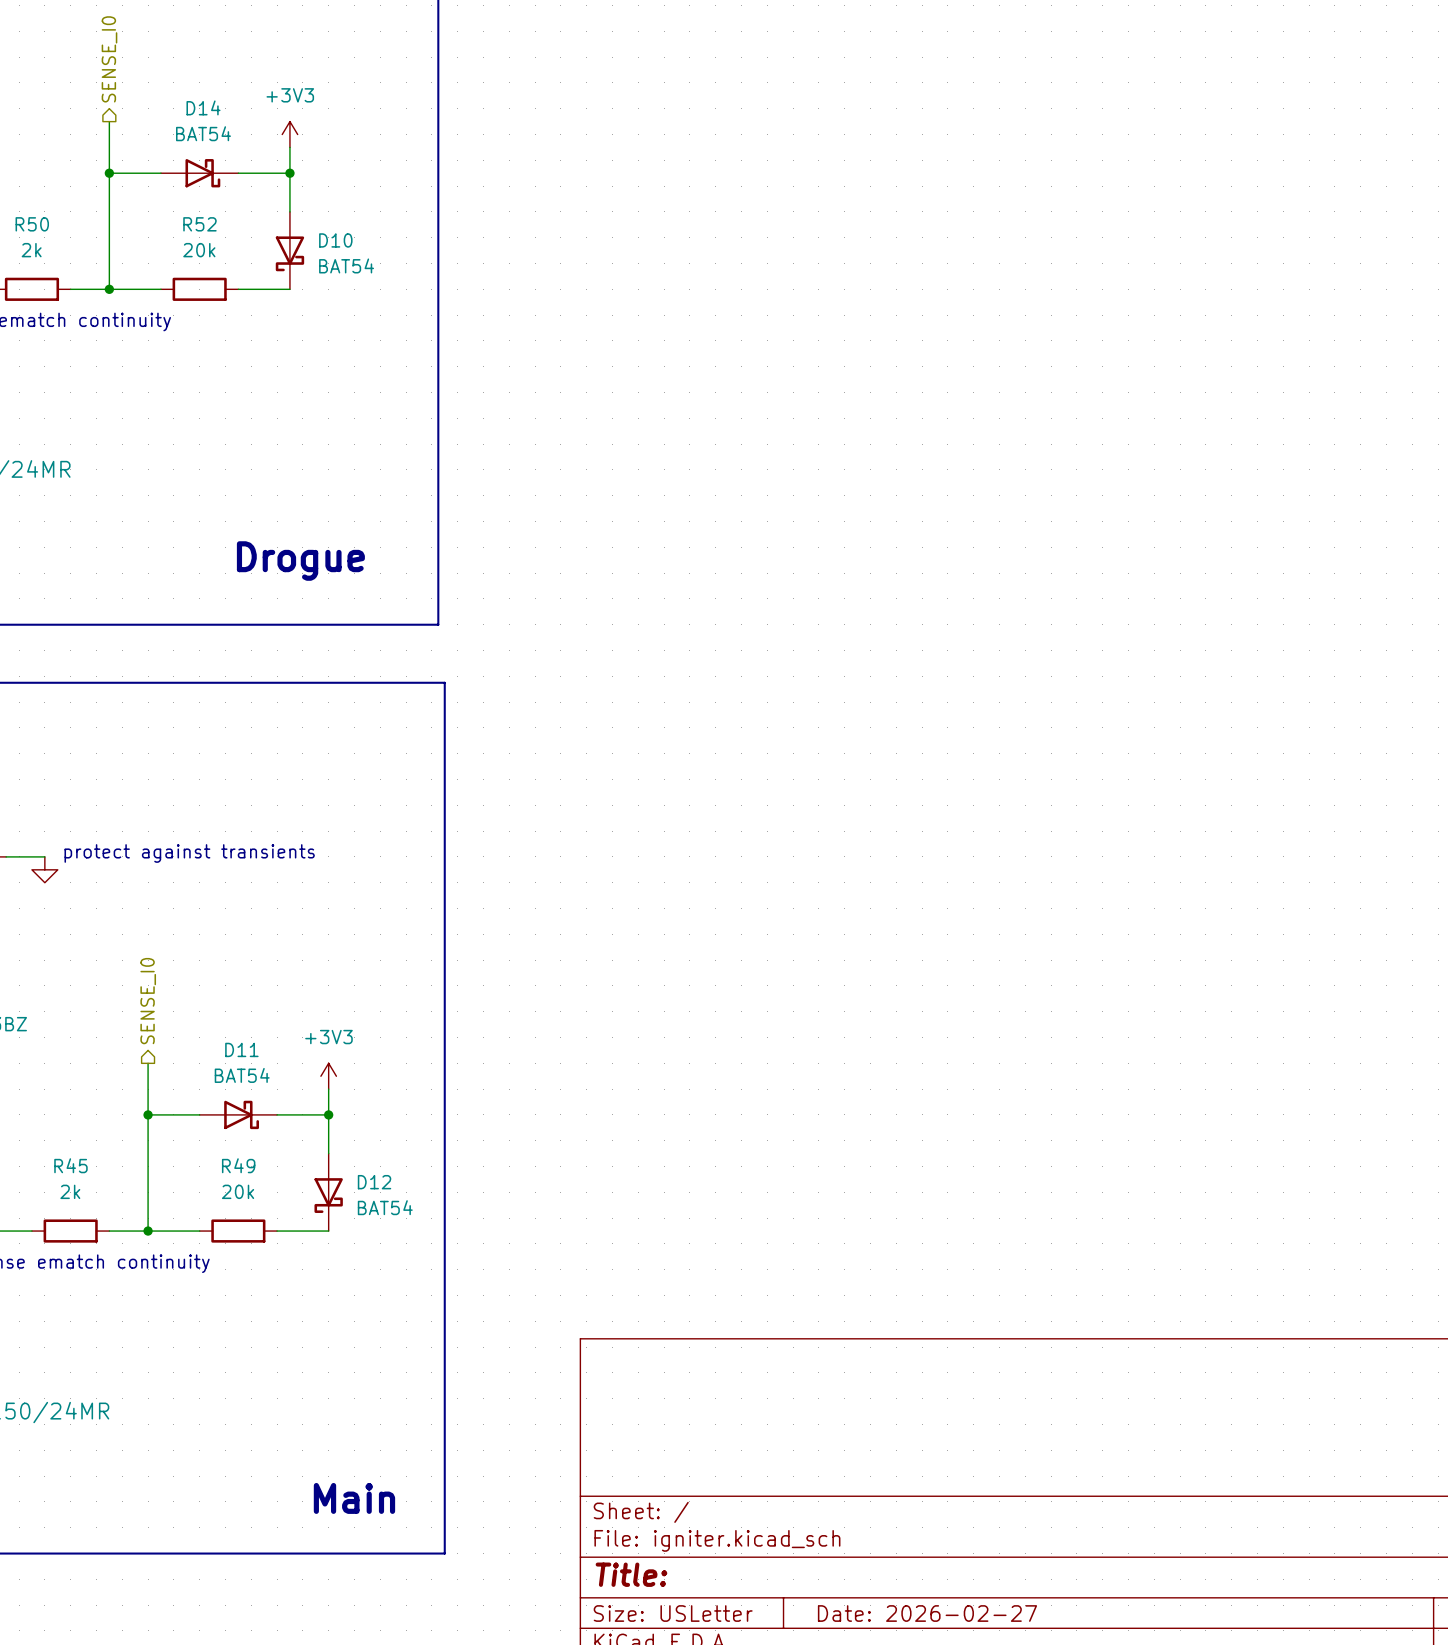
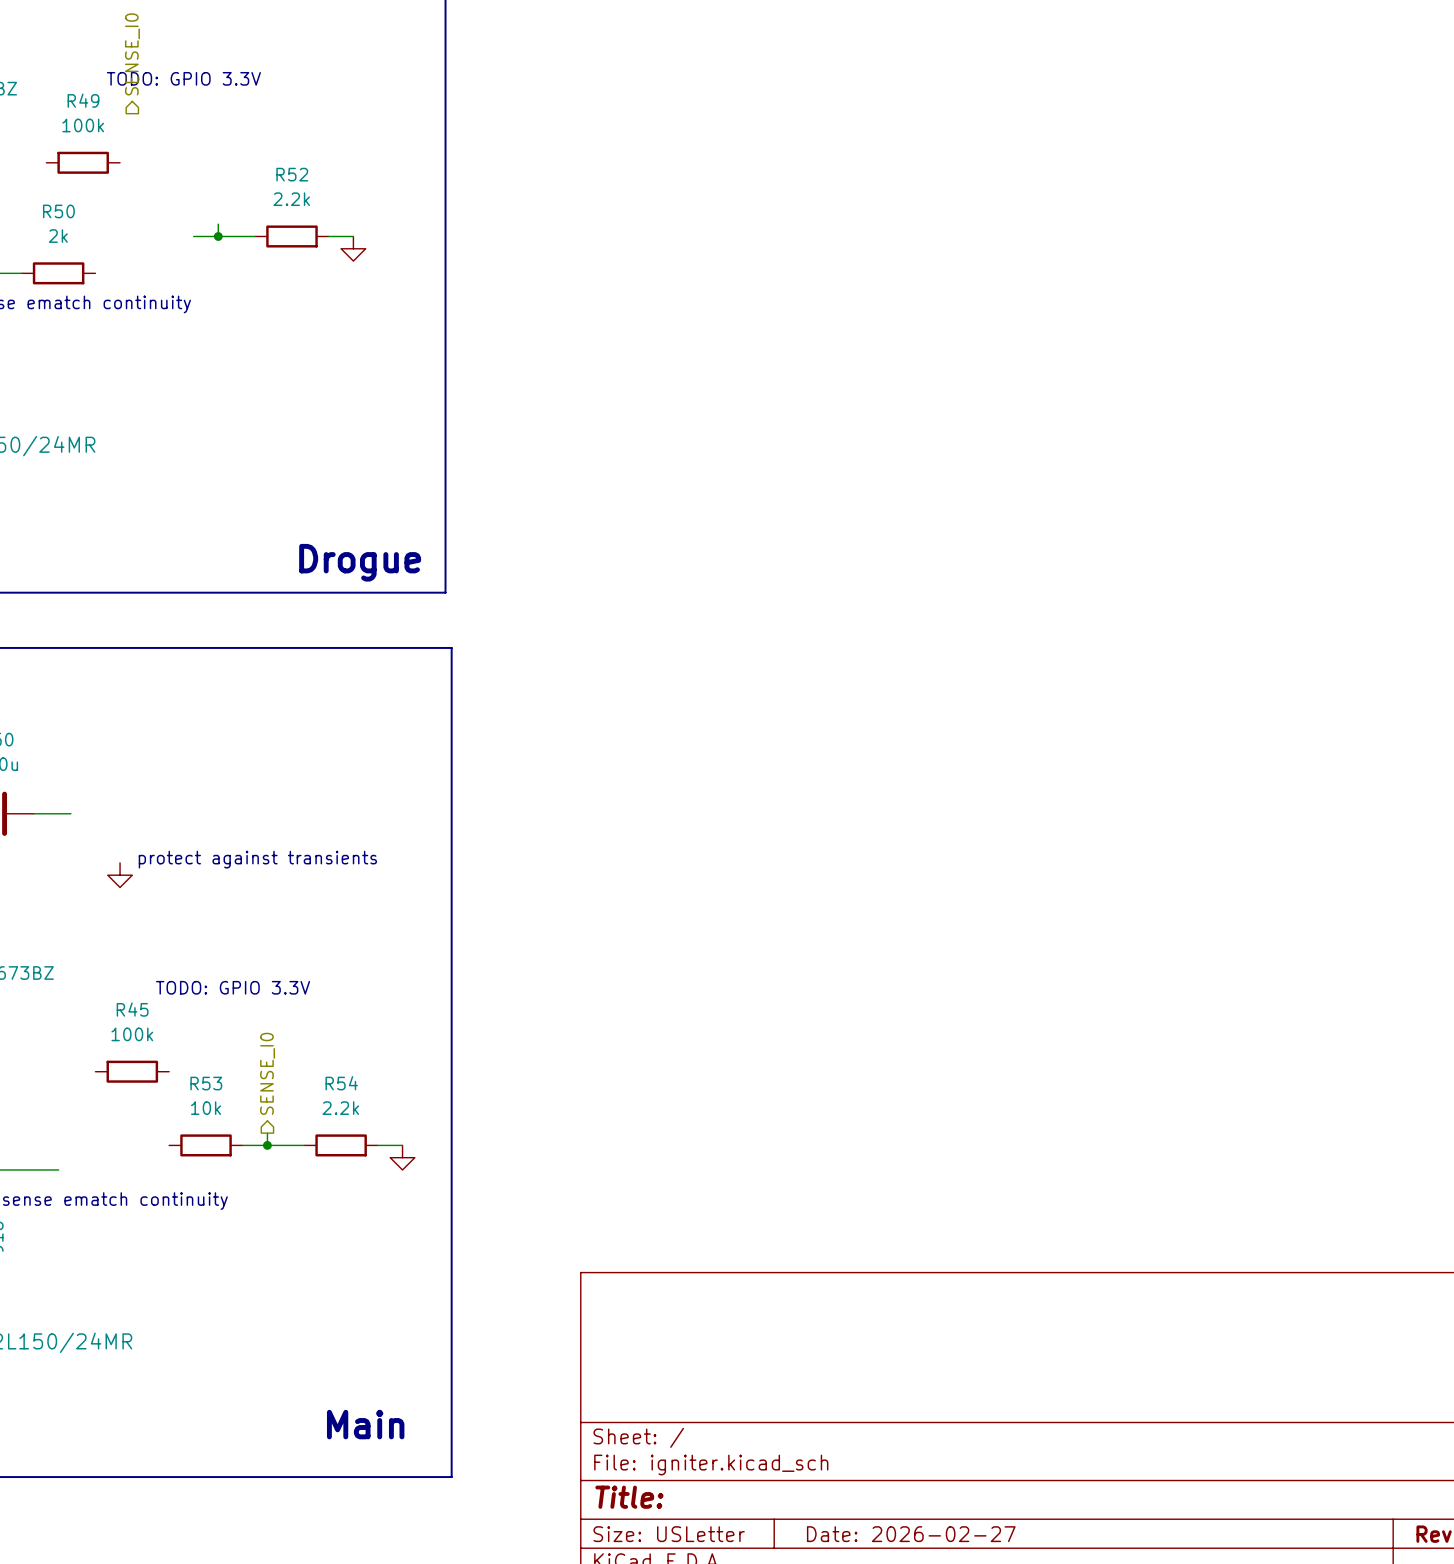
text: none -> TODO: GPIO 3.3V (183, 78)
wire: (109, 121) (109, 289) -> none
power symbol: +3V3 (289, 134) -> none
wire: (289, 147) (289, 211) -> none
wire: (109, 173) (160, 173) -> none
junction: (109, 173) -> none
D14: BAT54 (199, 173) -> none
wire: (238, 173) (289, 173) -> none
junction: (289, 173) -> none
wire: none -> (218, 224) (218, 236)
wire: none -> (193, 236) (255, 236)
junction: none -> (218, 236)
R52 value: 20k (199, 250) -> 2.2k (291, 199)
D10: BAT54 (289, 250) -> none
wire: none -> (328, 236) (353, 236)
power symbol: none -> (353, 248)
wire: (70, 289) (160, 289) -> none
junction: (109, 289) -> none
R52 position: (199, 289) -> (291, 236)
wire: (238, 289) (289, 289) -> none
text position: Drogue (300, 561) -> Drogue (360, 562)
text position: protect against transients (189, 853) -> protect against transients (257, 859)
power symbol position: (44, 869) -> (120, 875)
hierarchical label position: SENSE_I0 (148, 1001) -> SENSE_I0 (267, 1073)
text: none -> TODO: GPIO 3.3V (233, 987)
wire: (148, 1063) (148, 1231) -> none
power symbol: +3V3 (328, 1076) -> none
wire: (328, 1089) (328, 1153) -> none
wire: (148, 1114) (199, 1114) -> none
junction: (148, 1114) -> none
D11: BAT54 (238, 1114) -> none
wire: (277, 1114) (328, 1114) -> none
junction: (328, 1114) -> none
R45 value: 2k (70, 1191) -> 100k (132, 1034)
R49 value: 20k (238, 1191) -> 100k (83, 125)
wire: none -> (267, 1133) (267, 1145)
D12: BAT54 (328, 1192) -> none
R53: none -> 10k (206, 1145)
wire: none -> (242, 1145) (304, 1145)
junction: none -> (267, 1145)
R54: none -> 2.2k (341, 1145)
wire: none -> (377, 1145) (402, 1145)
power symbol: none -> (402, 1157)
R45 position: (70, 1231) -> (132, 1071)
wire: (109, 1231) (199, 1231) -> none
junction: (148, 1231) -> none
R49 position: (238, 1231) -> (83, 162)
wire: (277, 1231) (328, 1231) -> none

